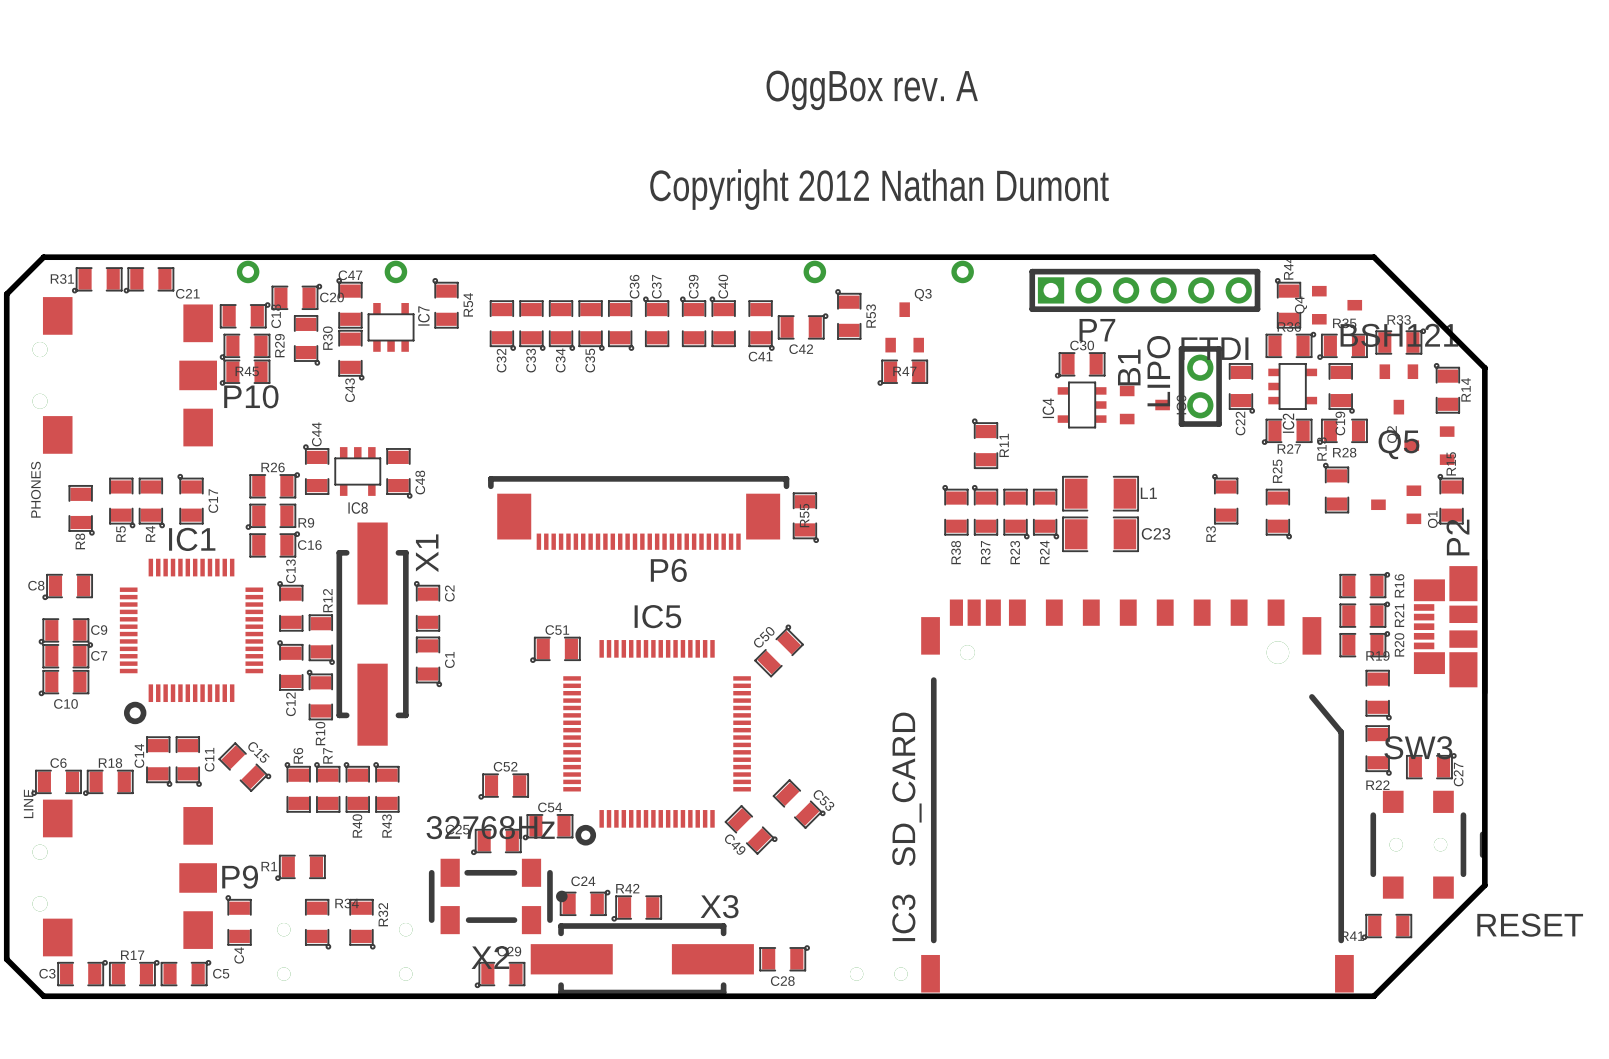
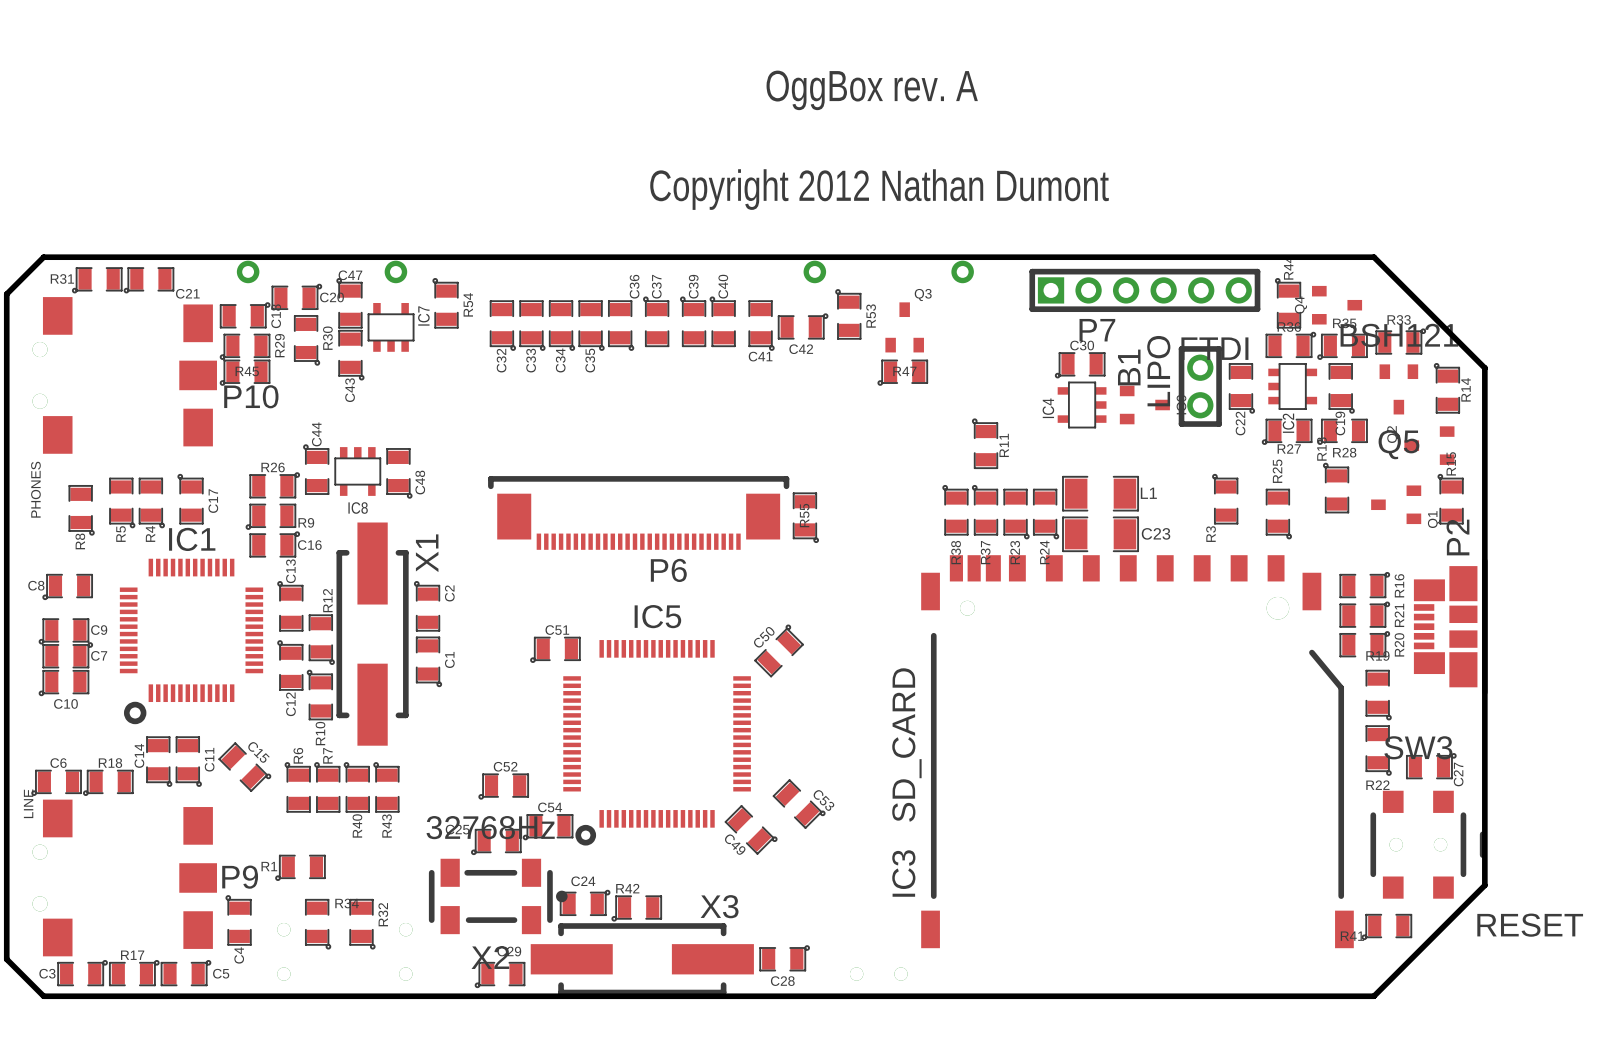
IC3 position: (1137, 796) -> (1137, 751)

